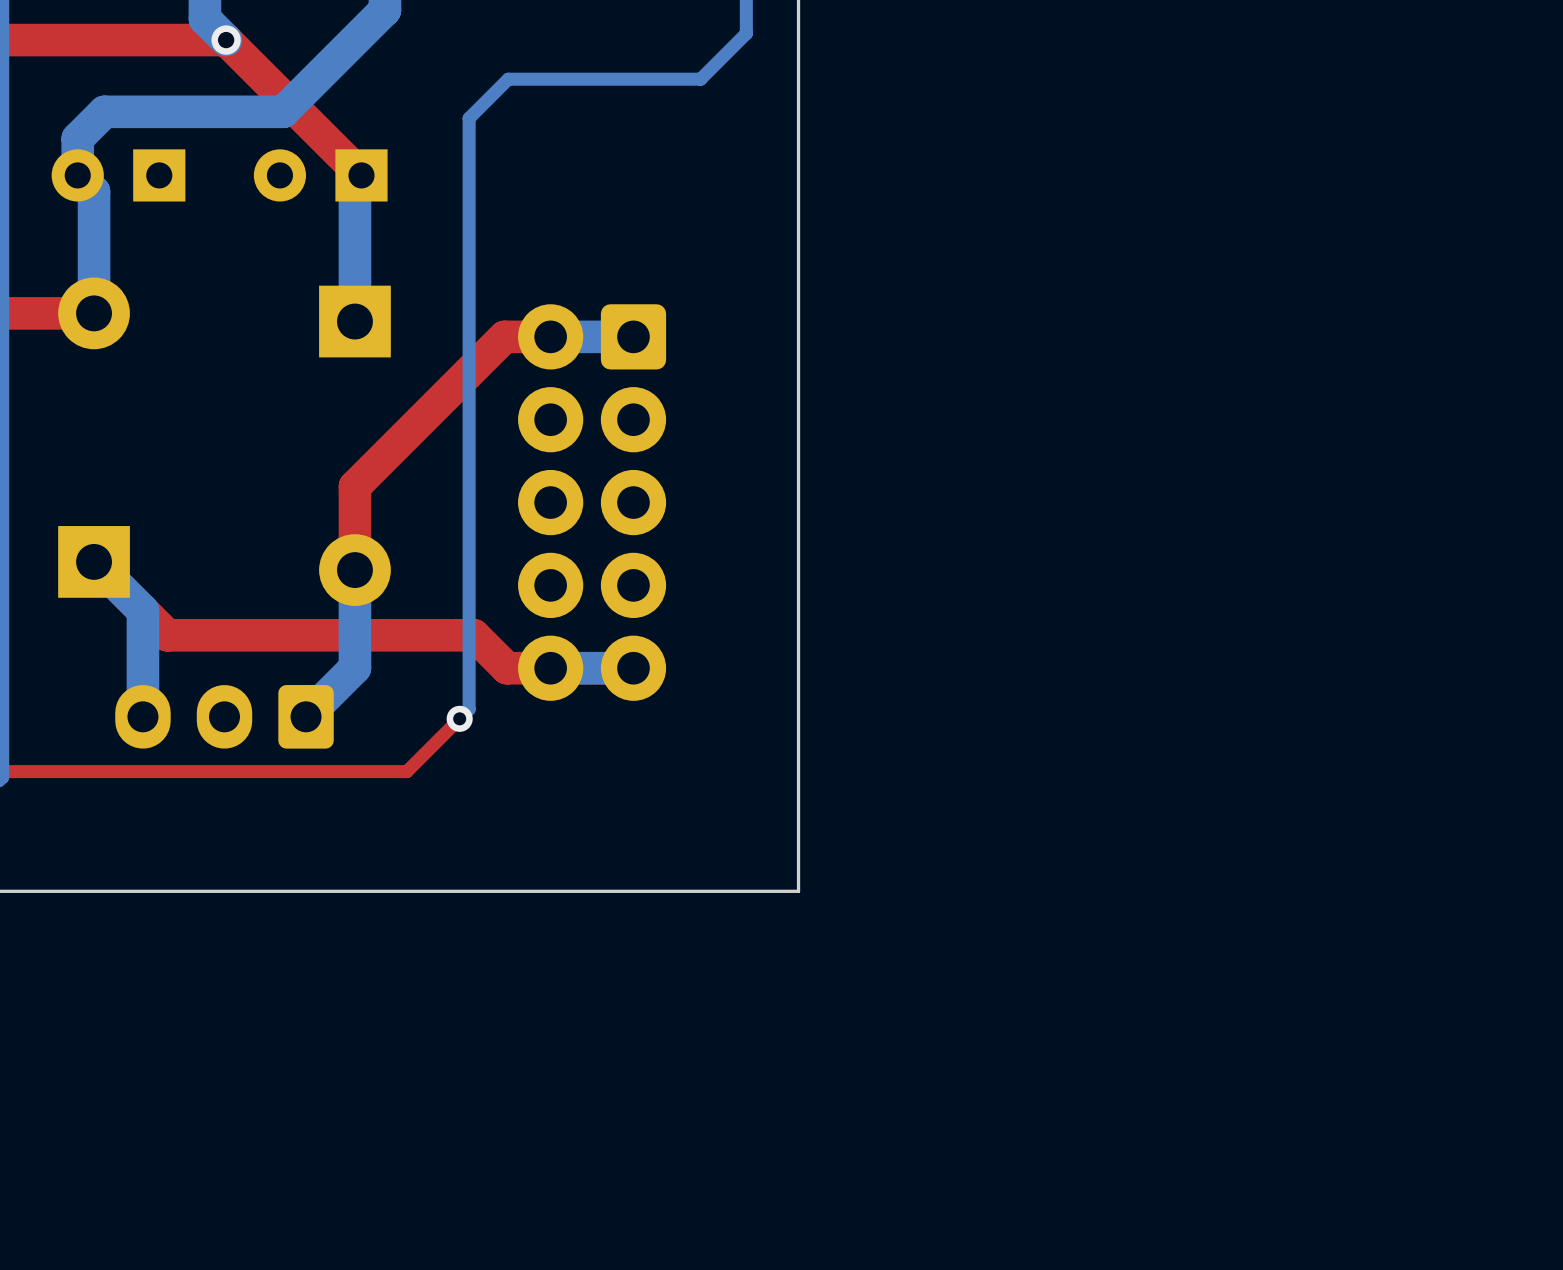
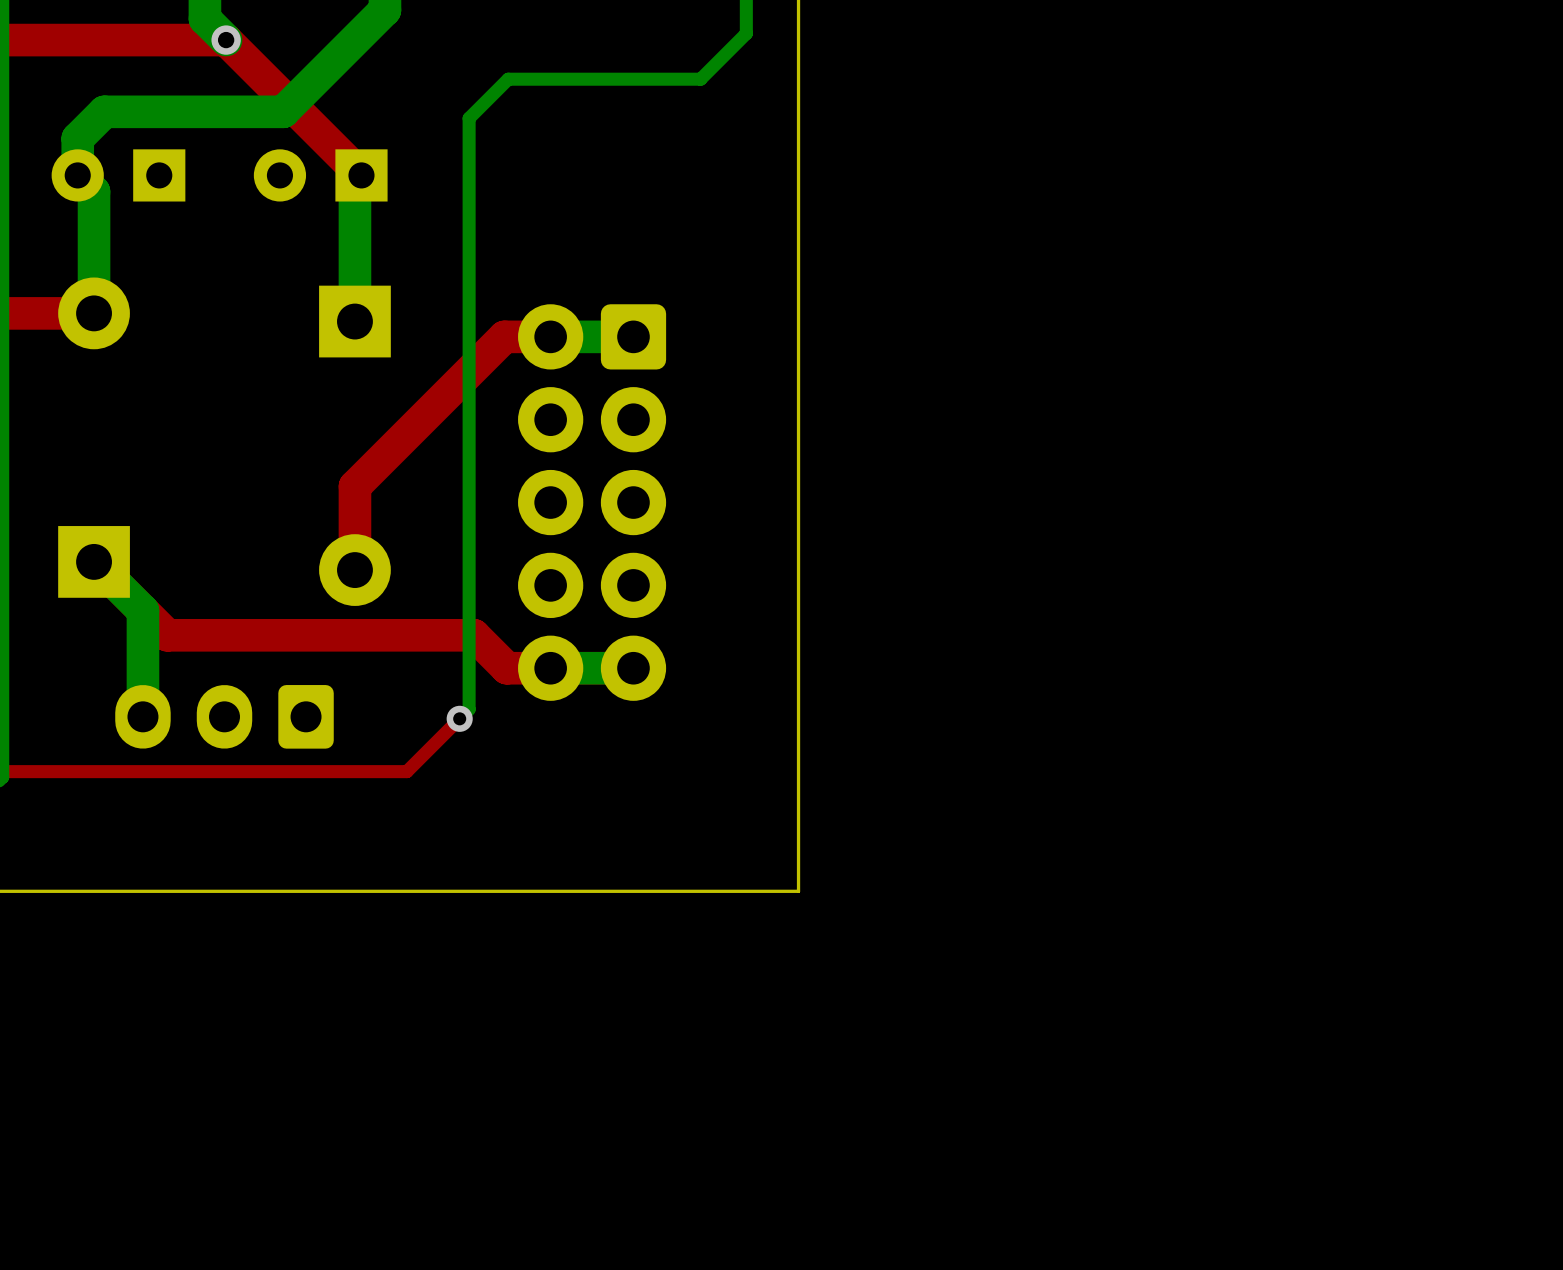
bottom track: (354, 570) (354, 667) (306, 716) -> none

